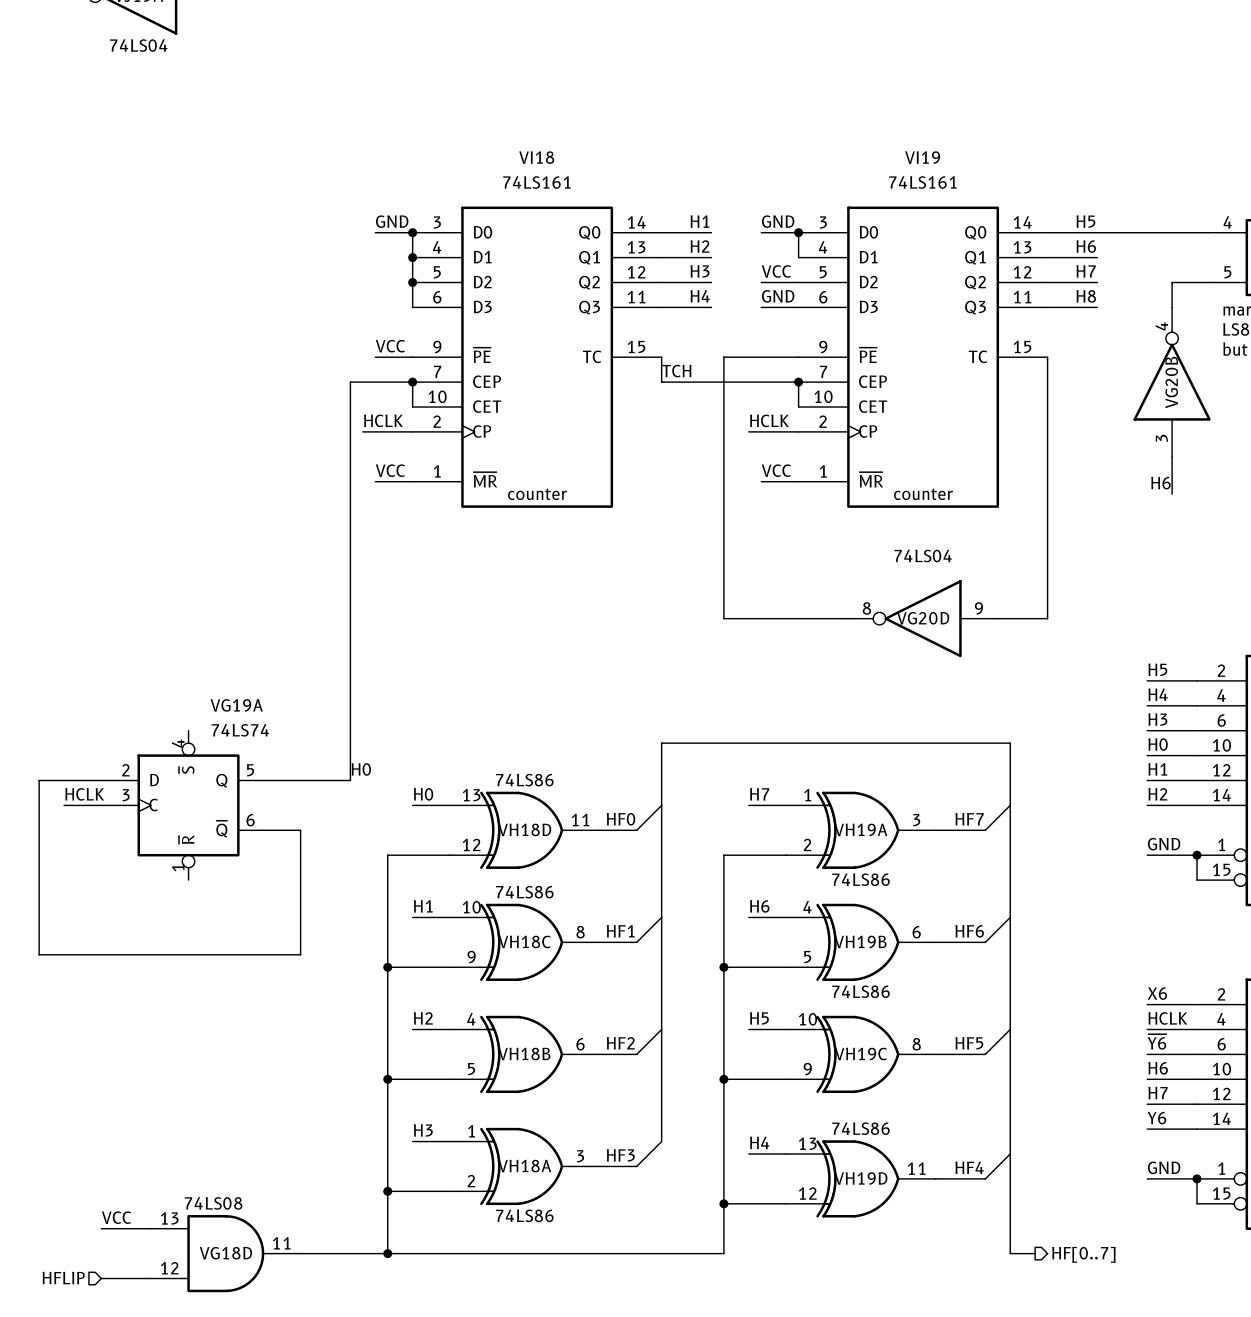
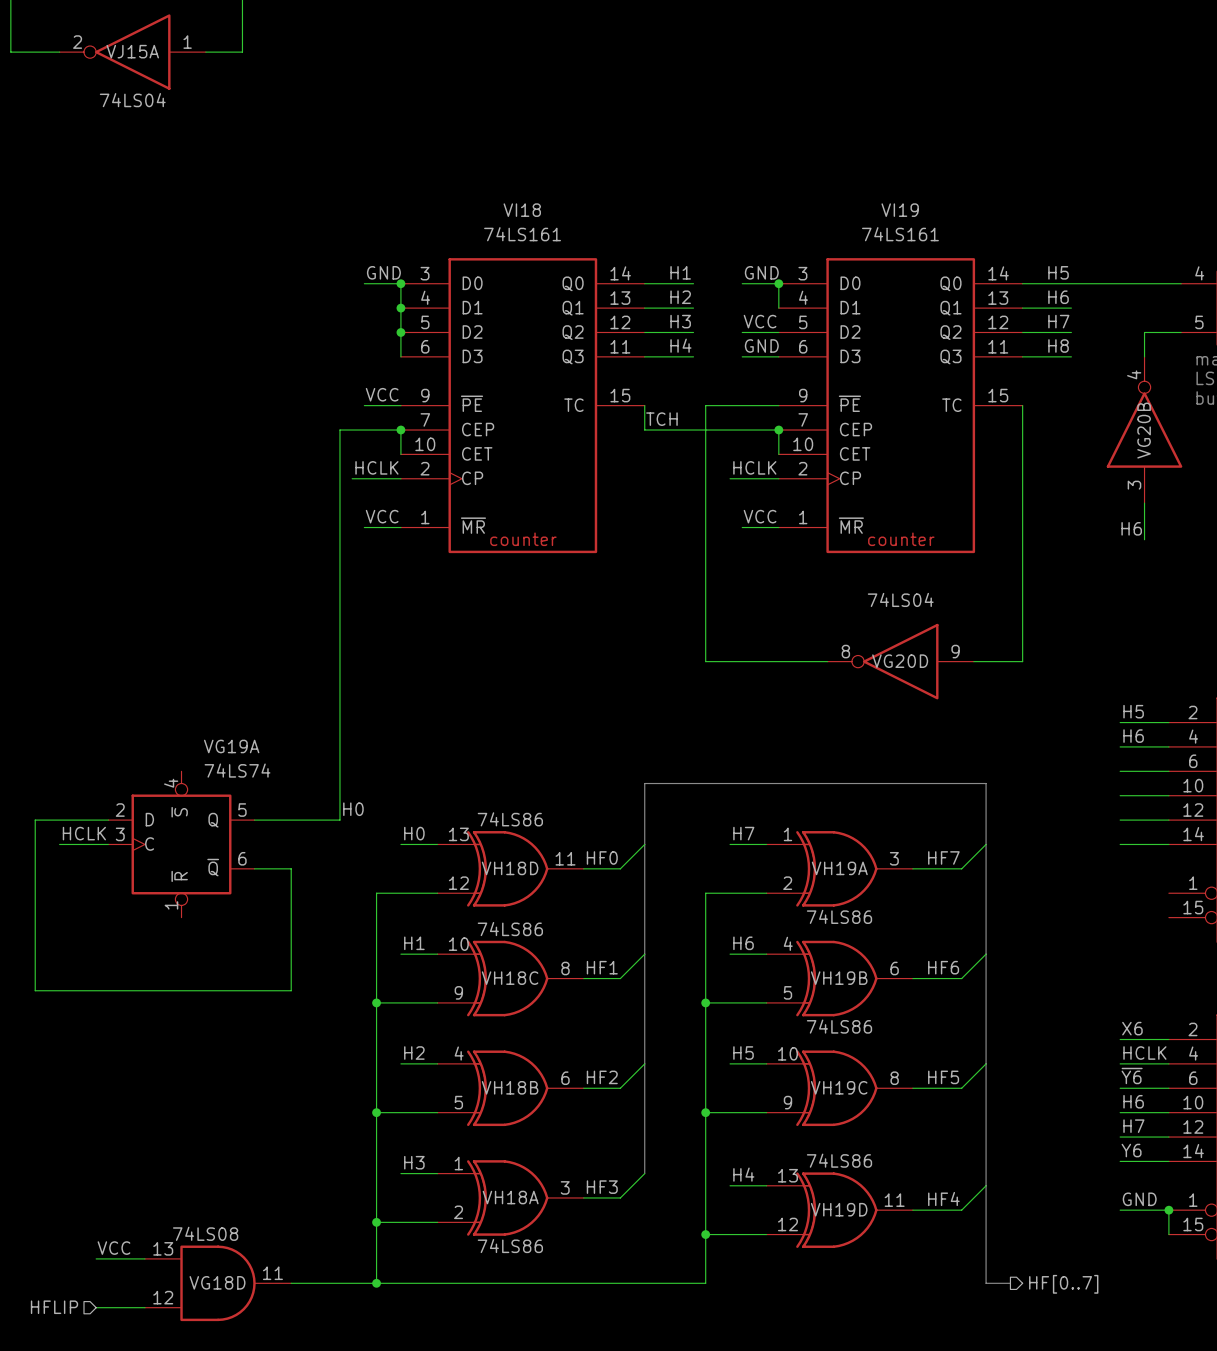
label: H4 (1158, 694) -> H6 (1133, 736)
label: H3 (1157, 719) -> none
label: H0 (1158, 744) -> none
label: H1 (1157, 769) -> none
label: H2 (1157, 794) -> none
label: GND (1164, 844) -> none
wire: (1147, 855) (1197, 855) (1197, 880) -> none
junction: (1197, 855) -> none

